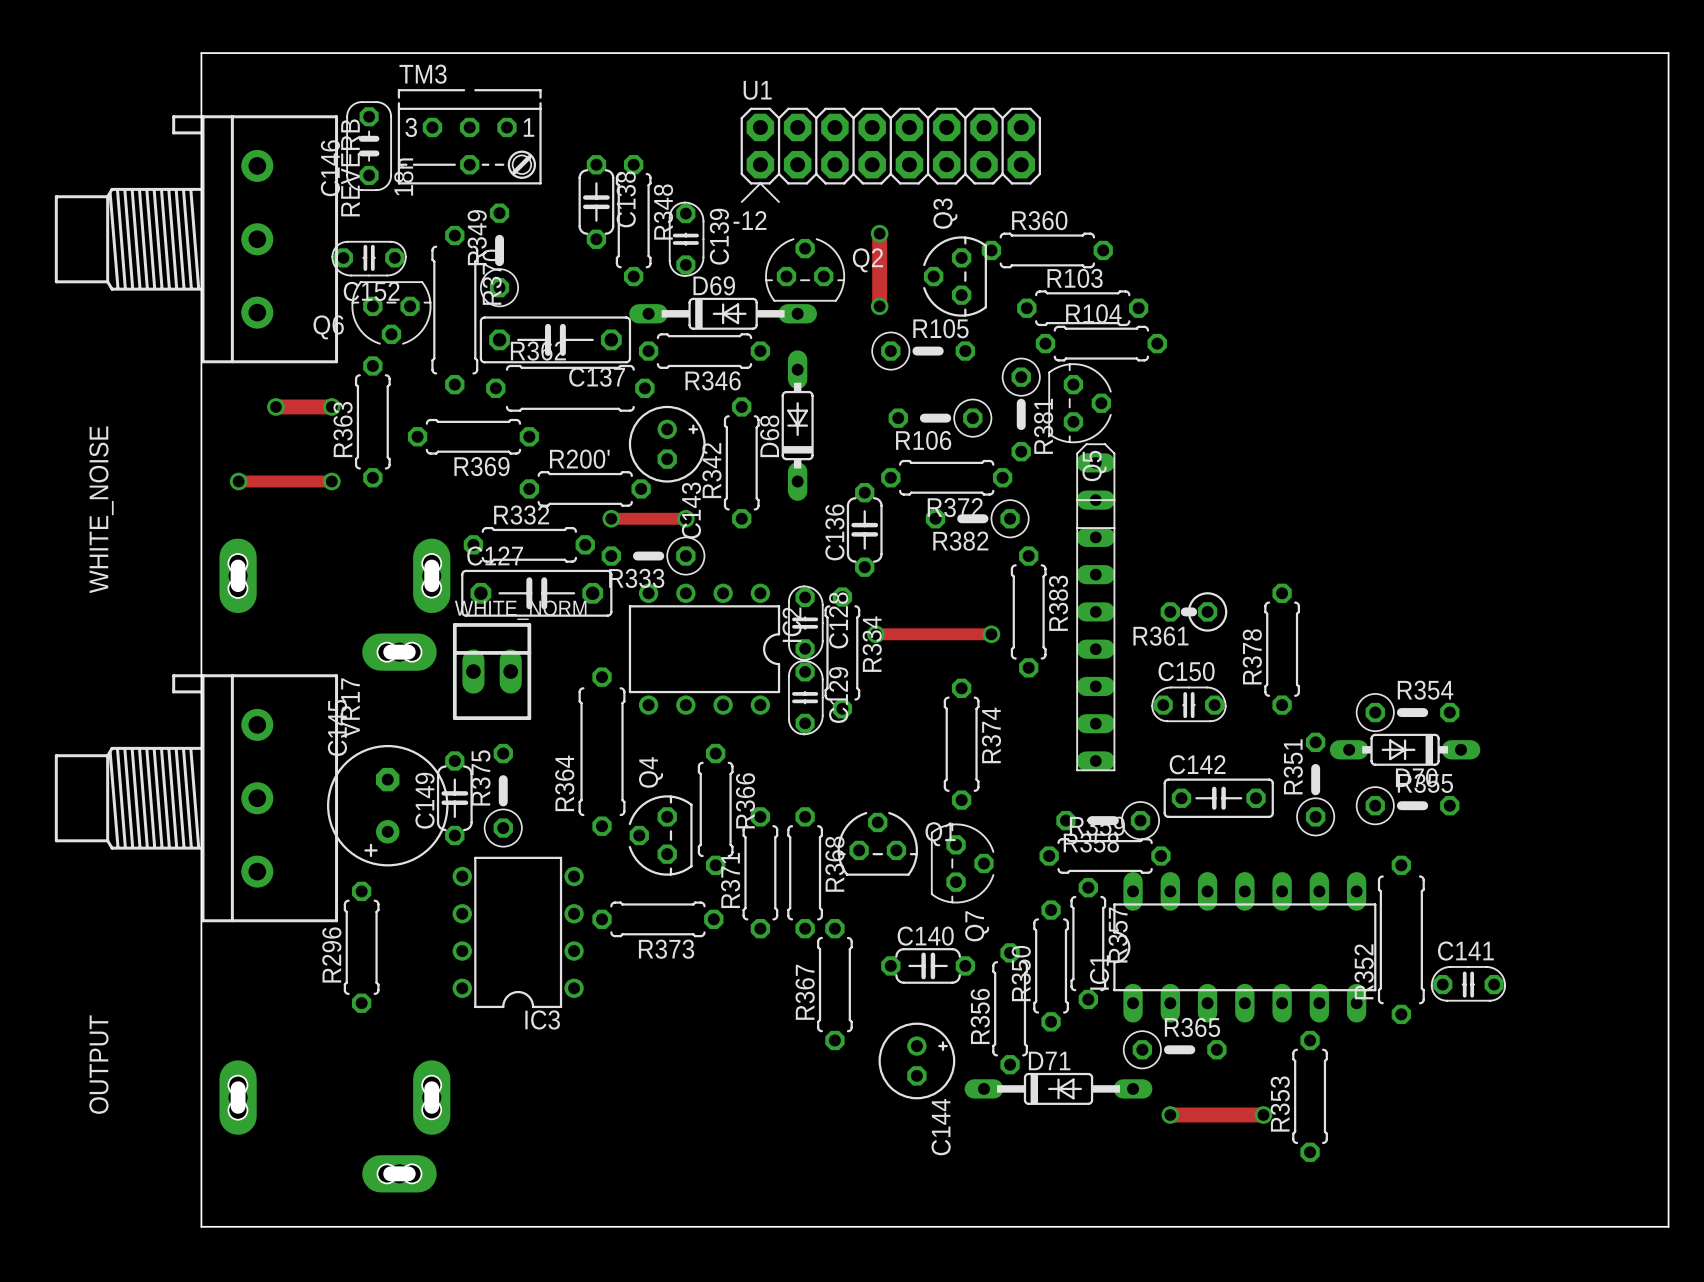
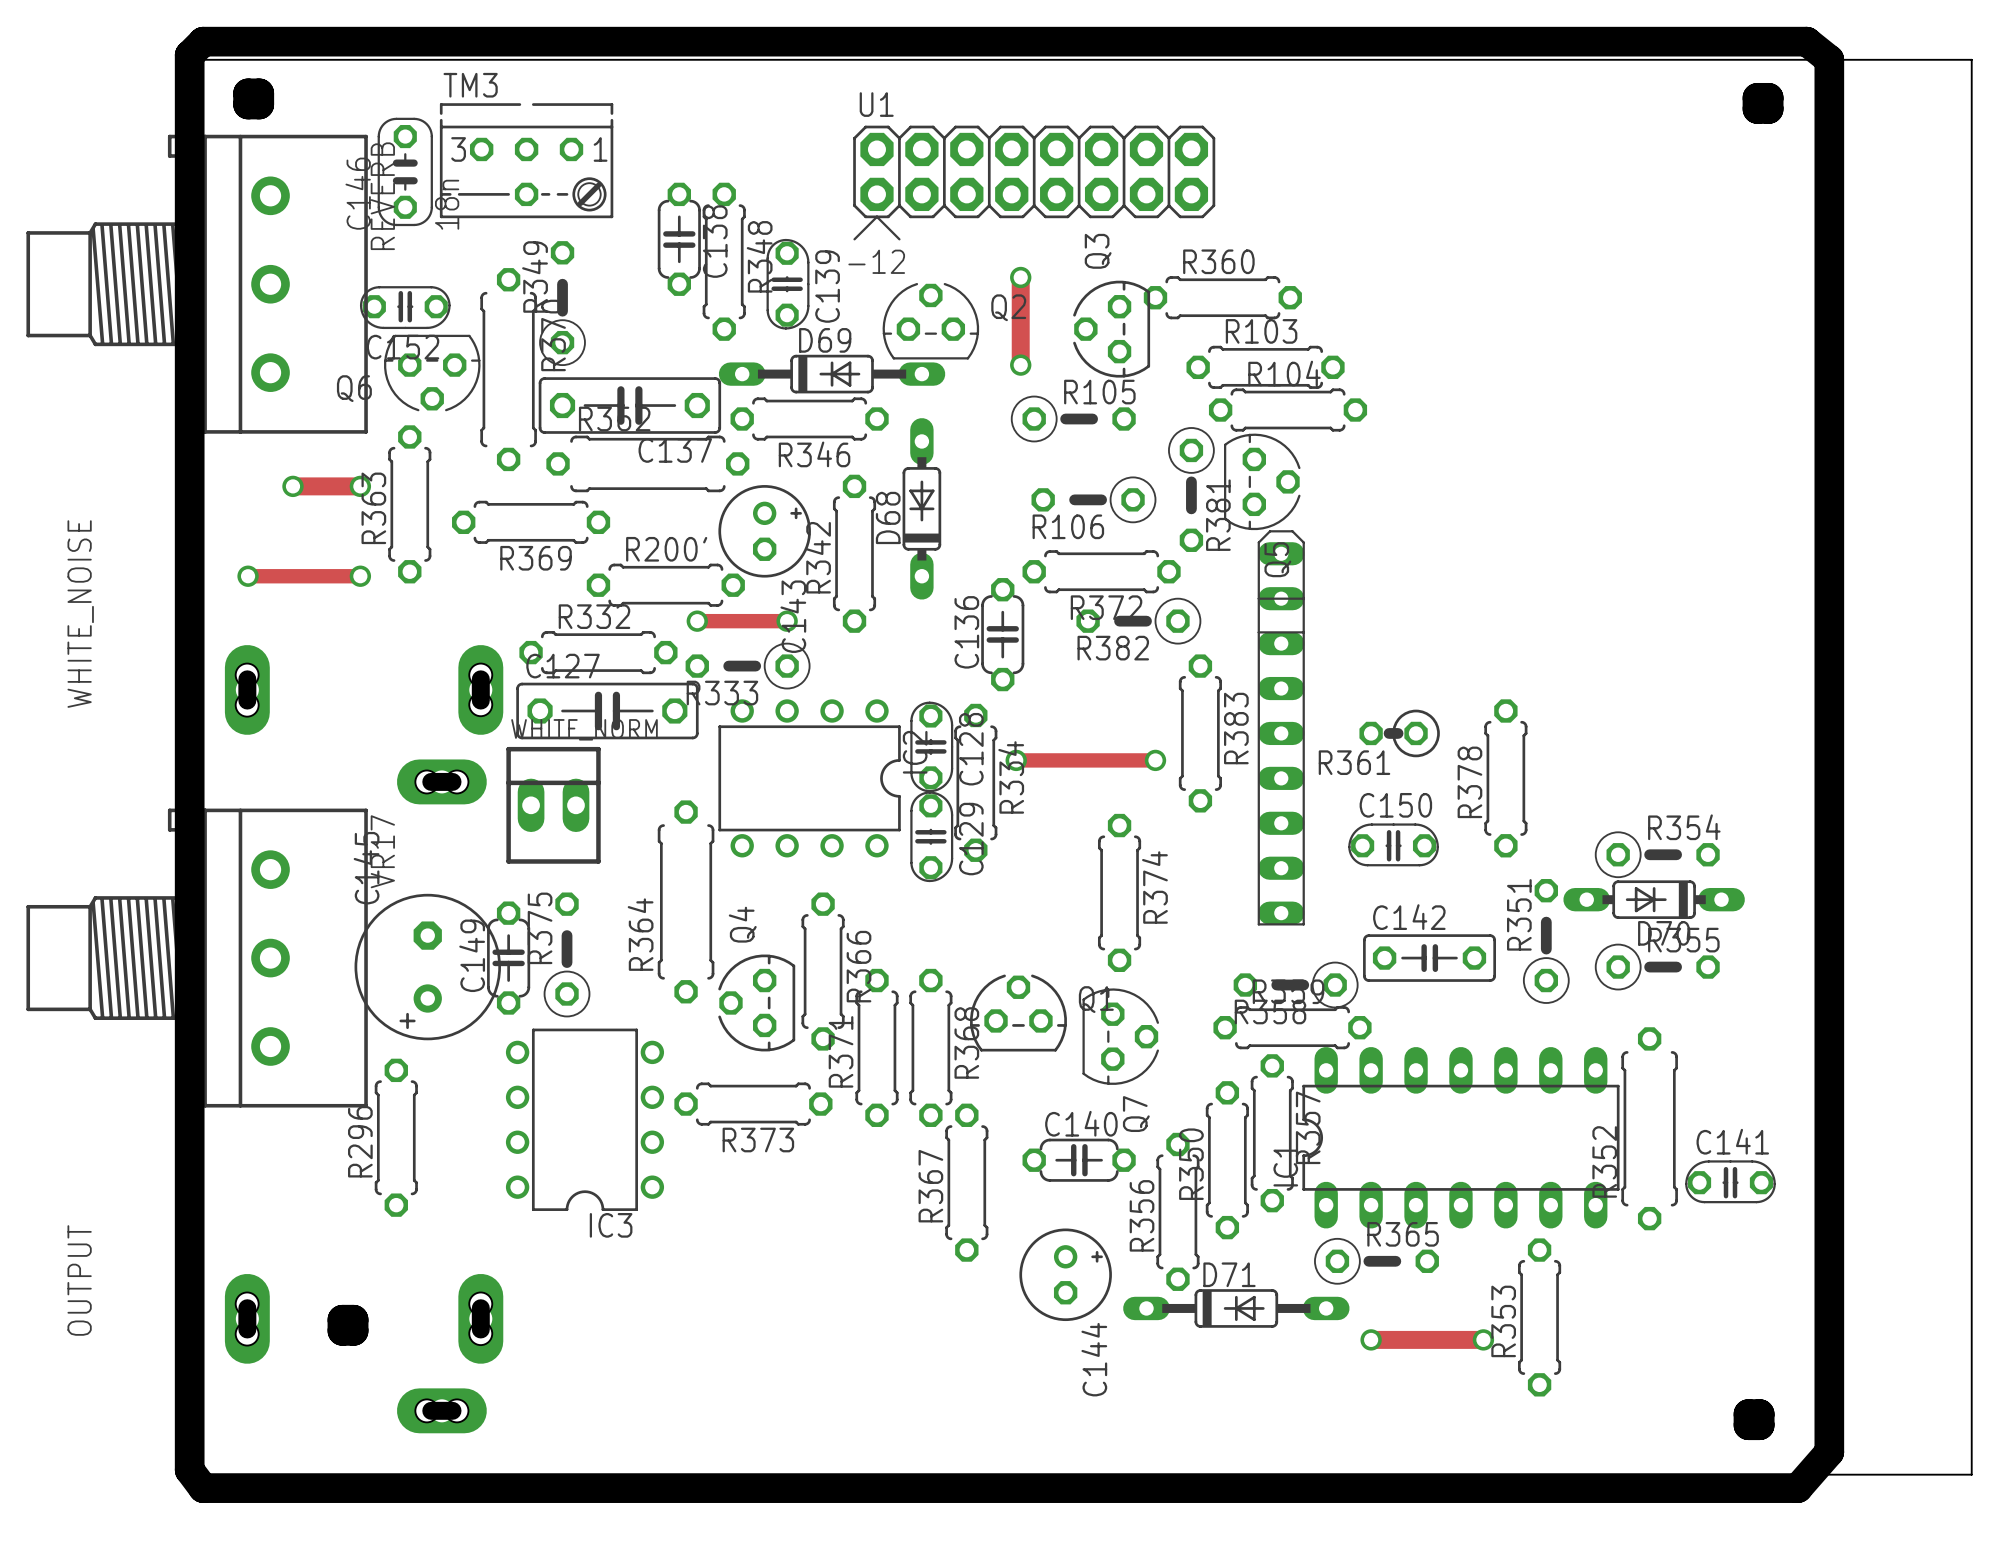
board edge: none -> (203, 41) (1806, 41) (1829, 59) (1829, 1452) (1797, 1488) (203, 1488) (189, 1470) (189, 55) (203, 41)
board edge: none -> (248, 93) (248, 104) (259, 104) (259, 93) (248, 93)
board edge: none -> (1757, 97) (1757, 109) (1768, 109) (1768, 97) (1757, 97)
board edge: none -> (342, 1319) (342, 1330) (353, 1330) (353, 1319) (342, 1319)
board edge: none -> (1748, 1414) (1748, 1425) (1759, 1425) (1759, 1414) (1748, 1414)

